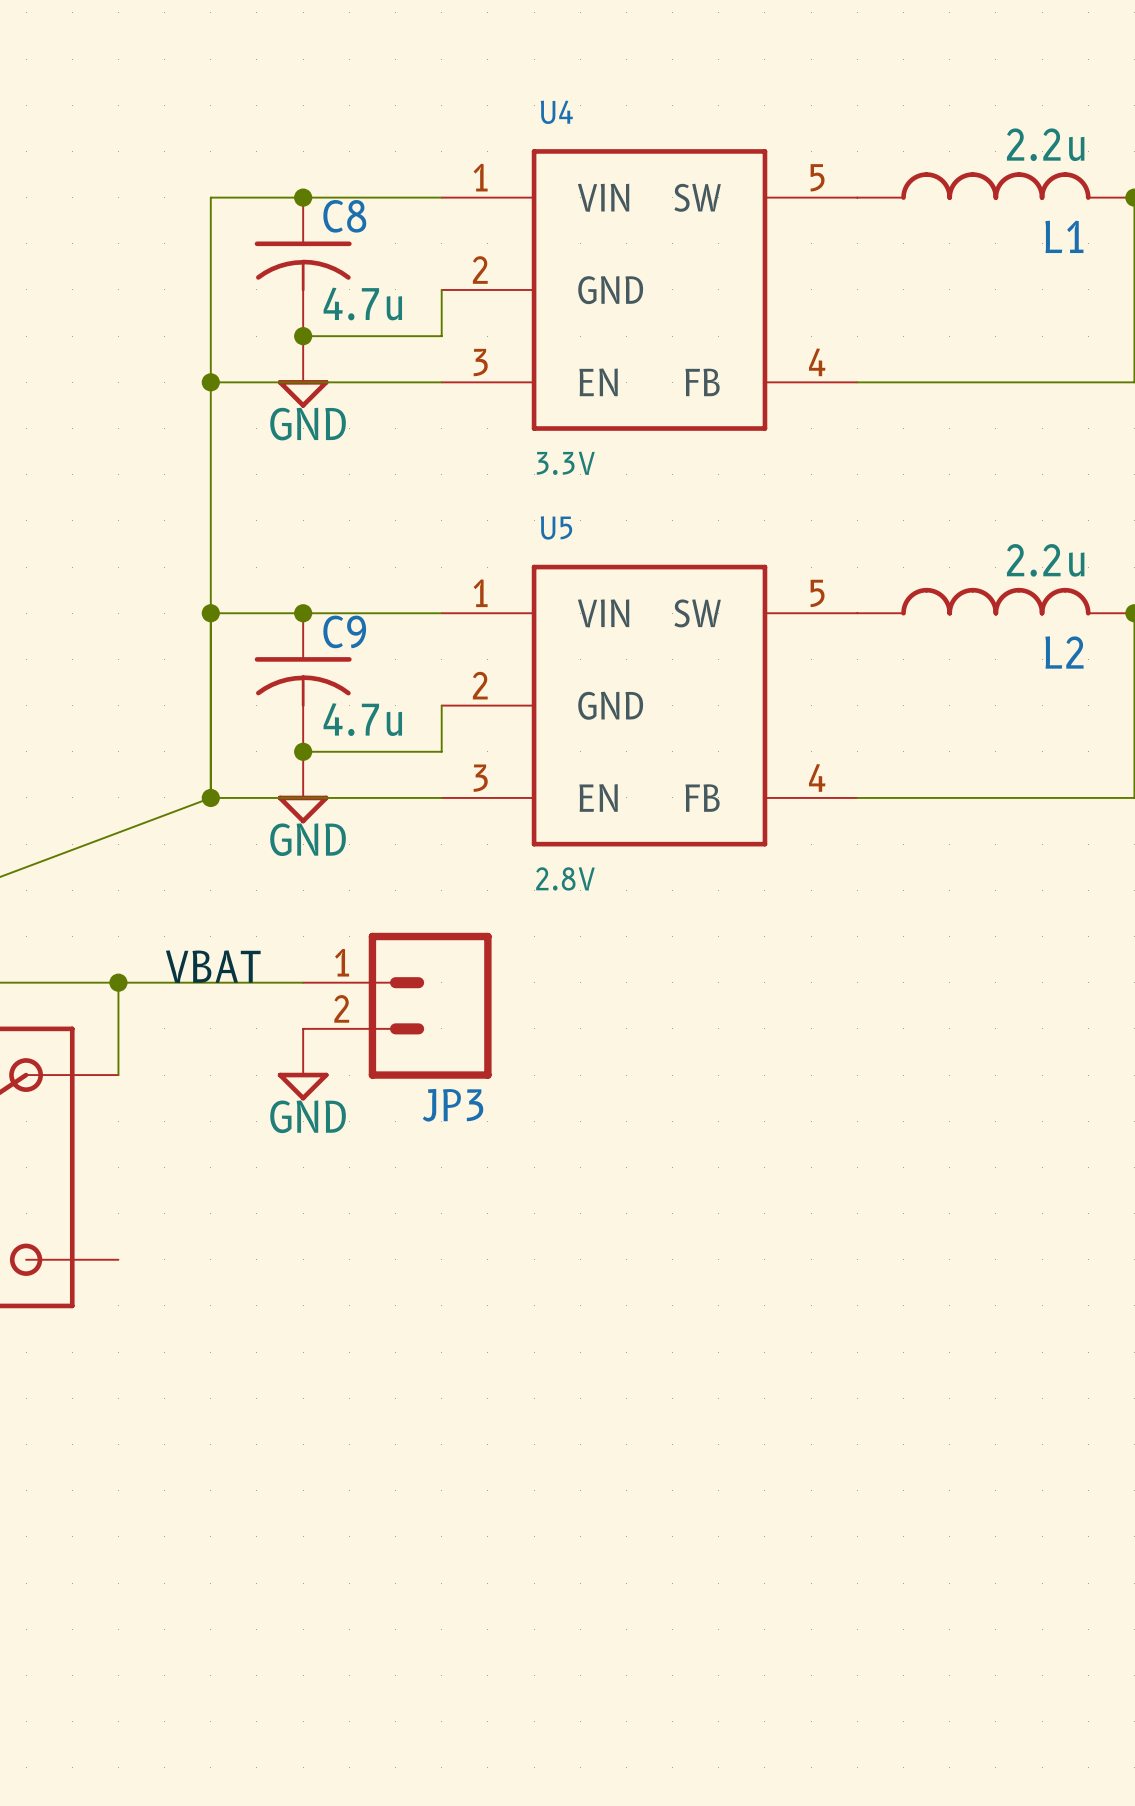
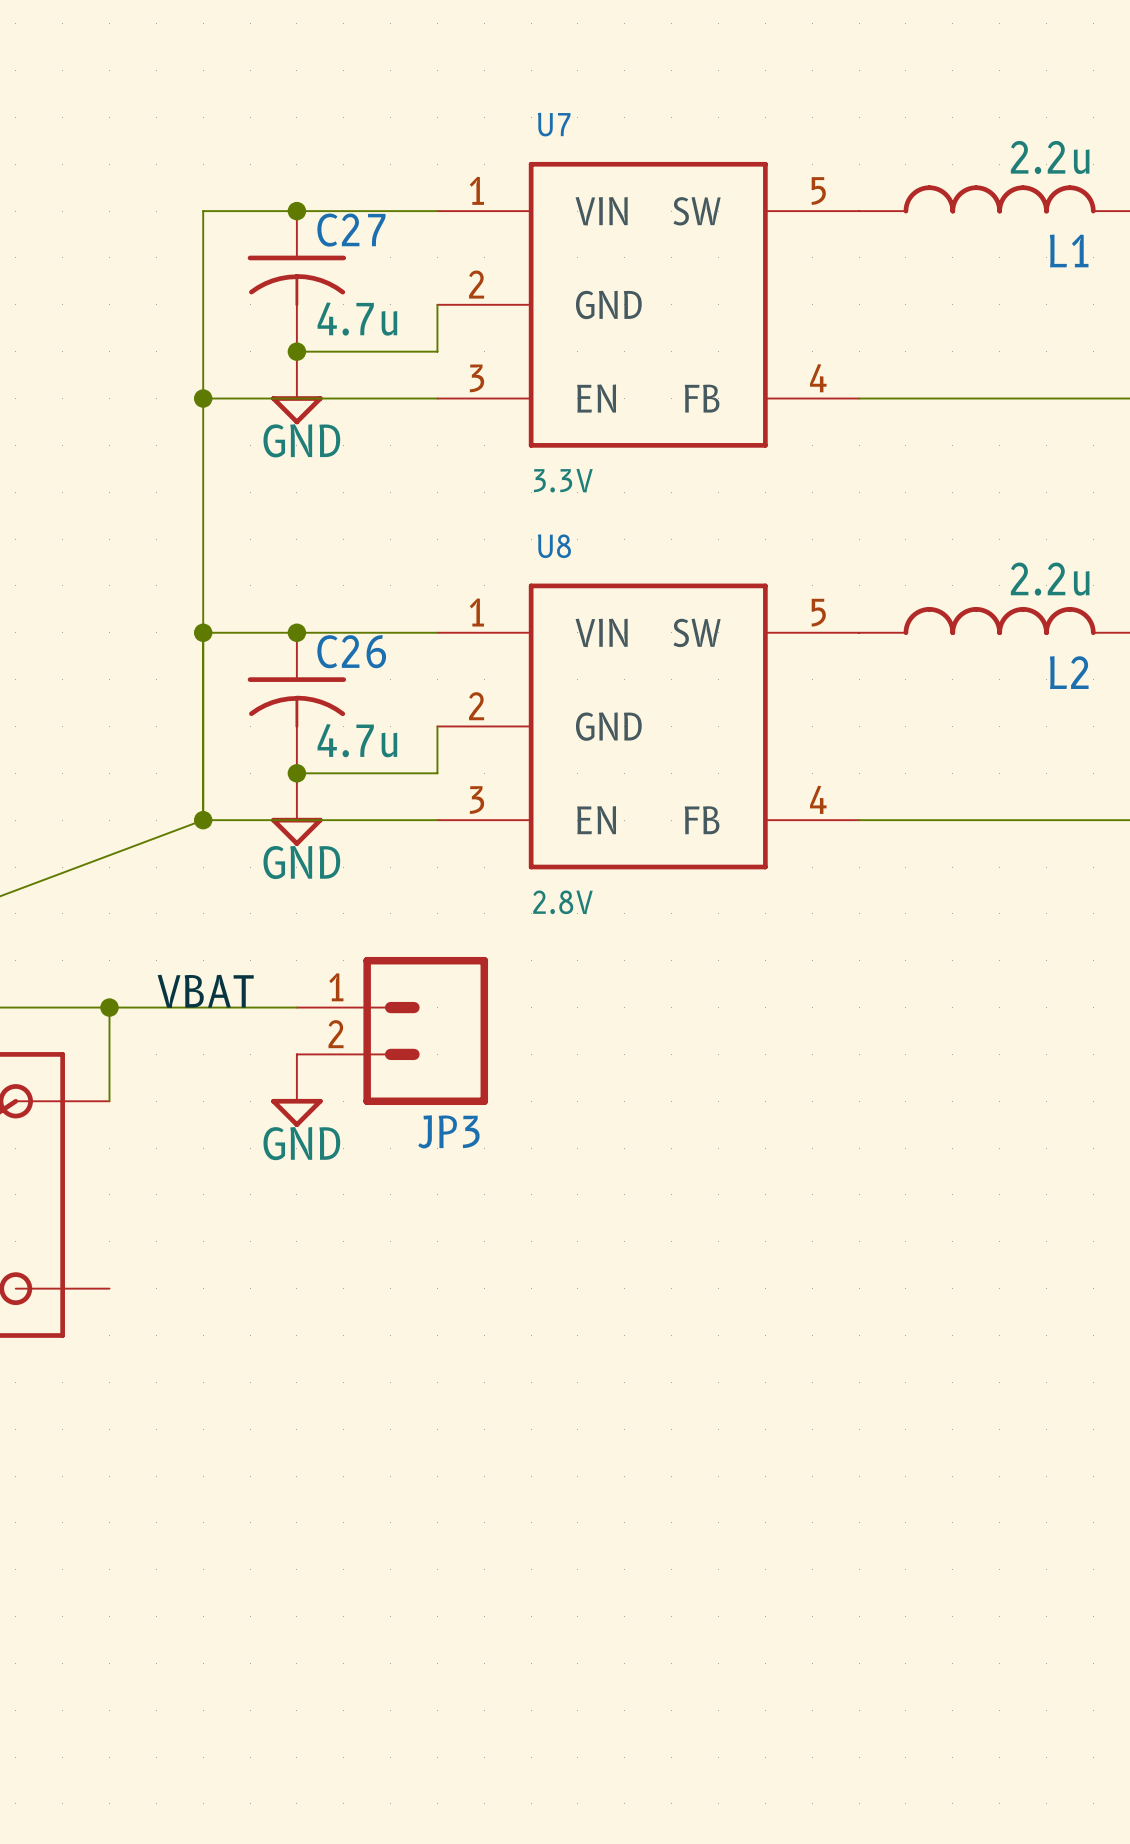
U4 name: U4 (556, 112) -> U7 (554, 124)
C8 name: C8 (344, 216) -> C27 (351, 230)
U5 name: U5 (556, 527) -> U8 (554, 546)
C9 name: C9 (344, 631) -> C26 (351, 651)

